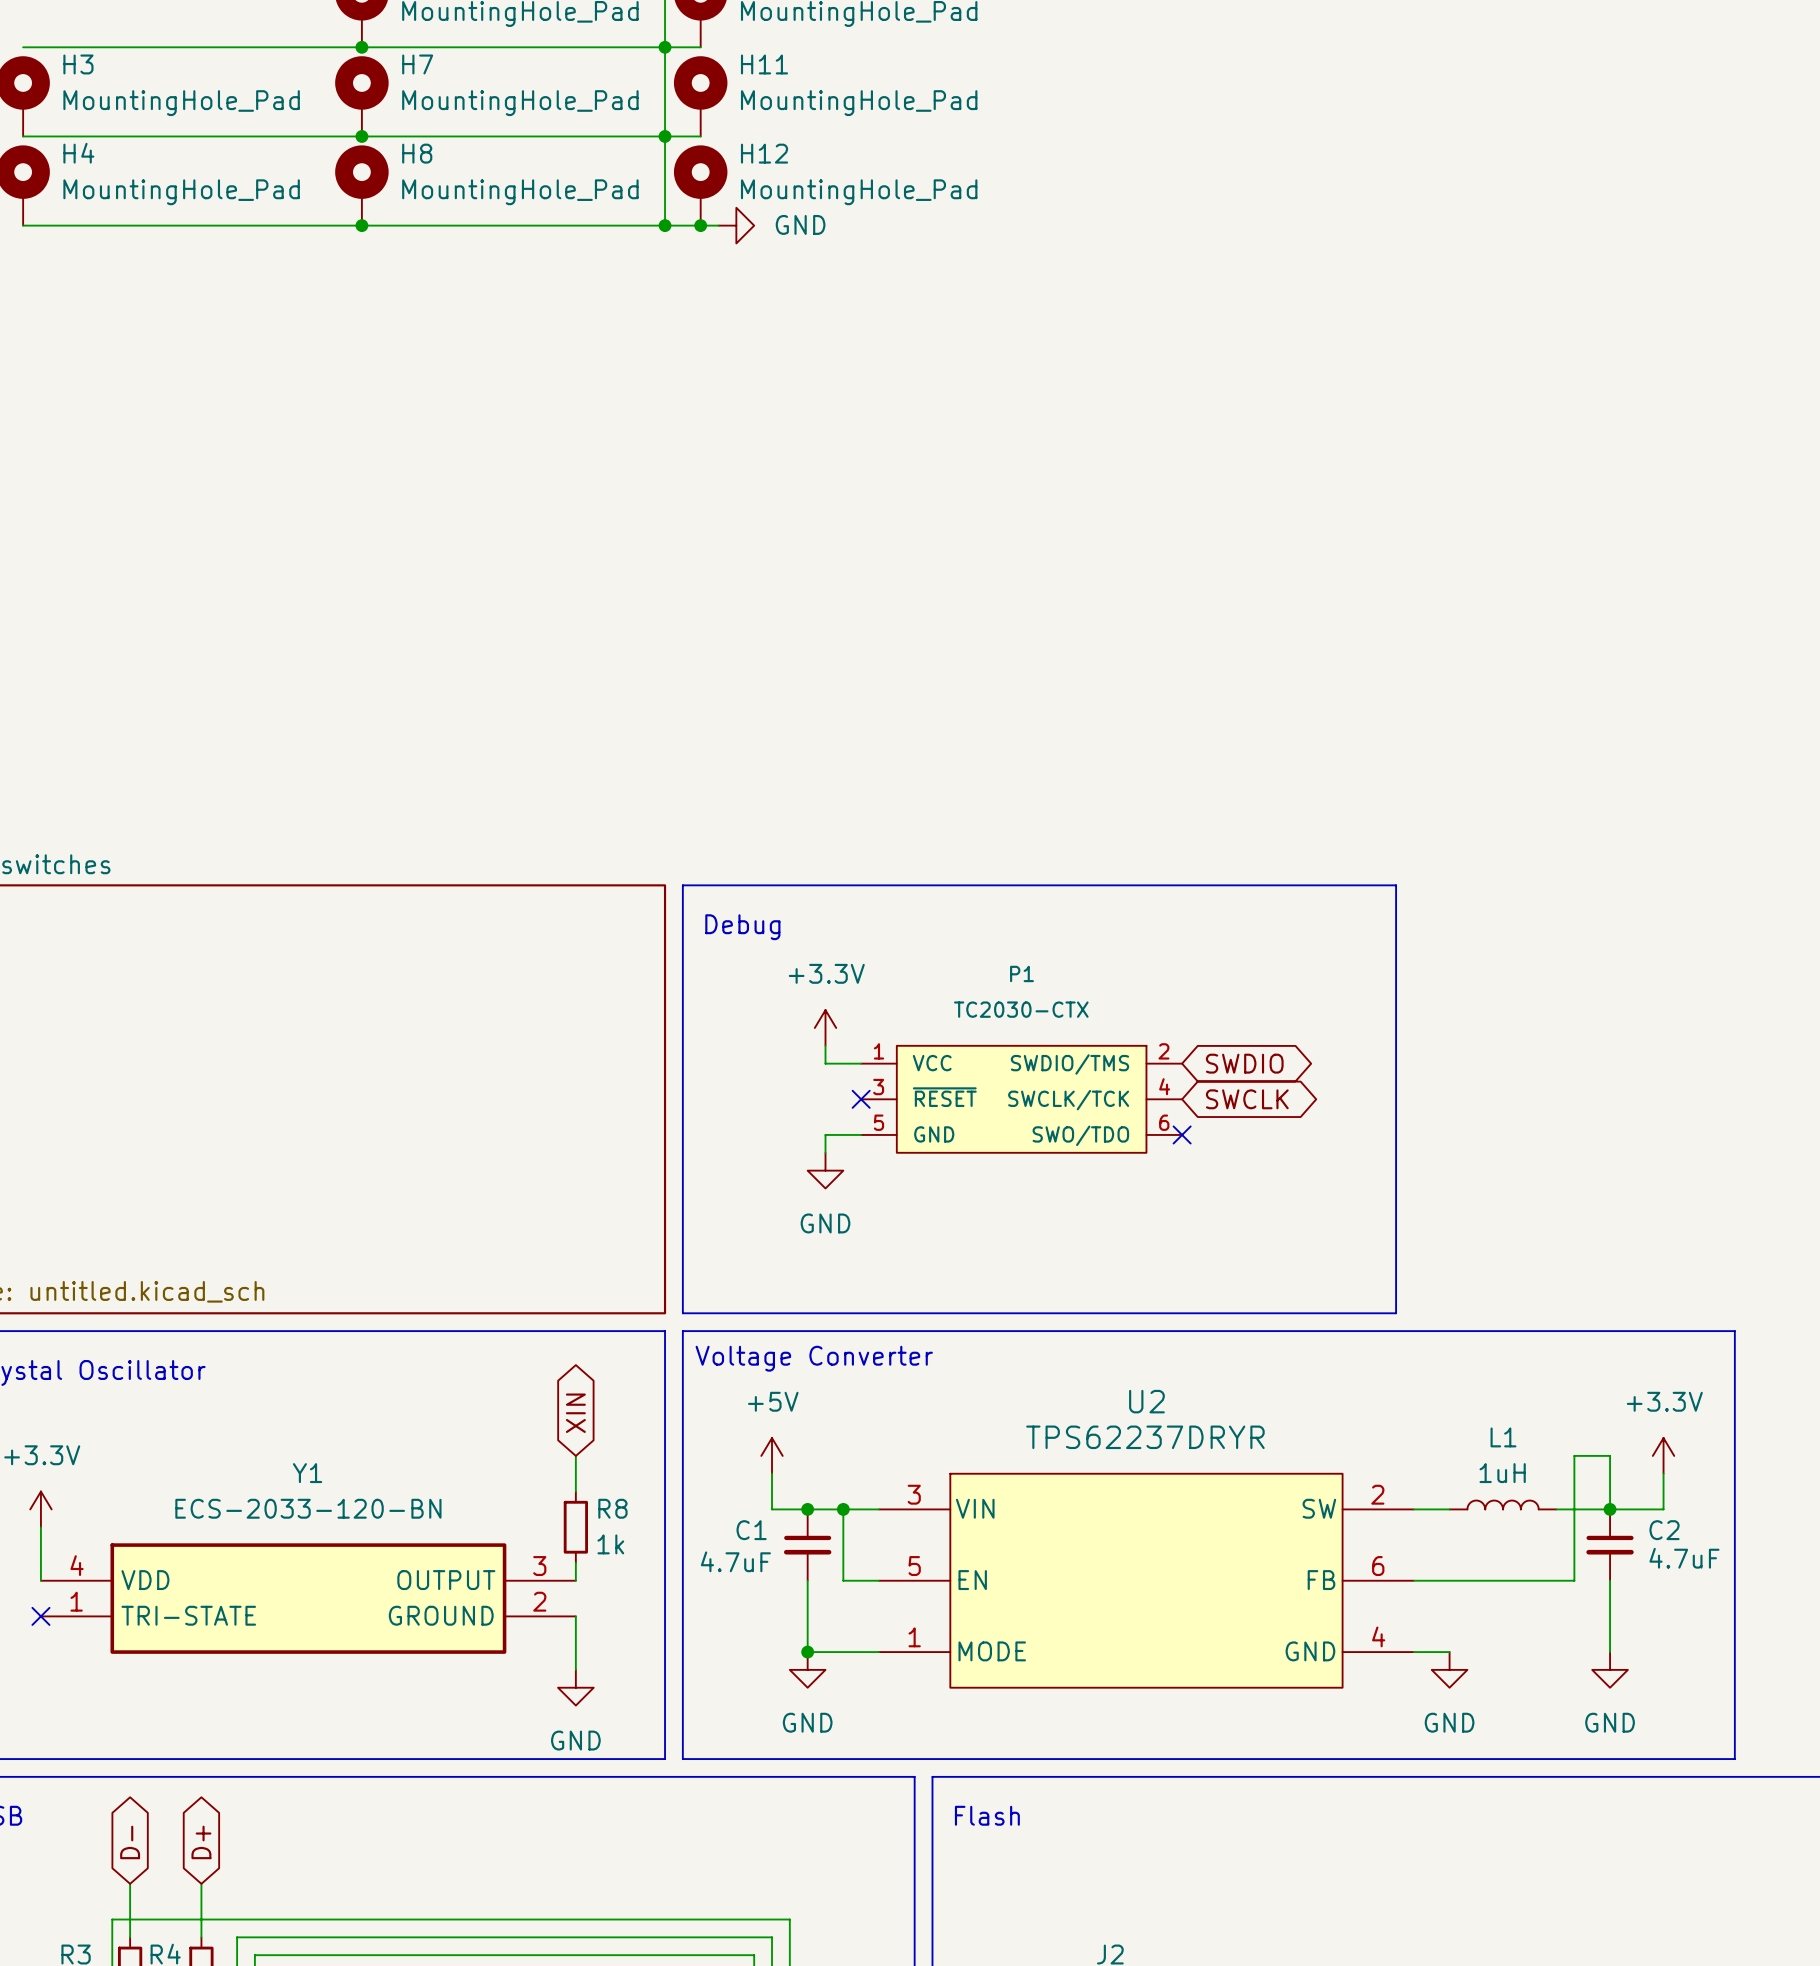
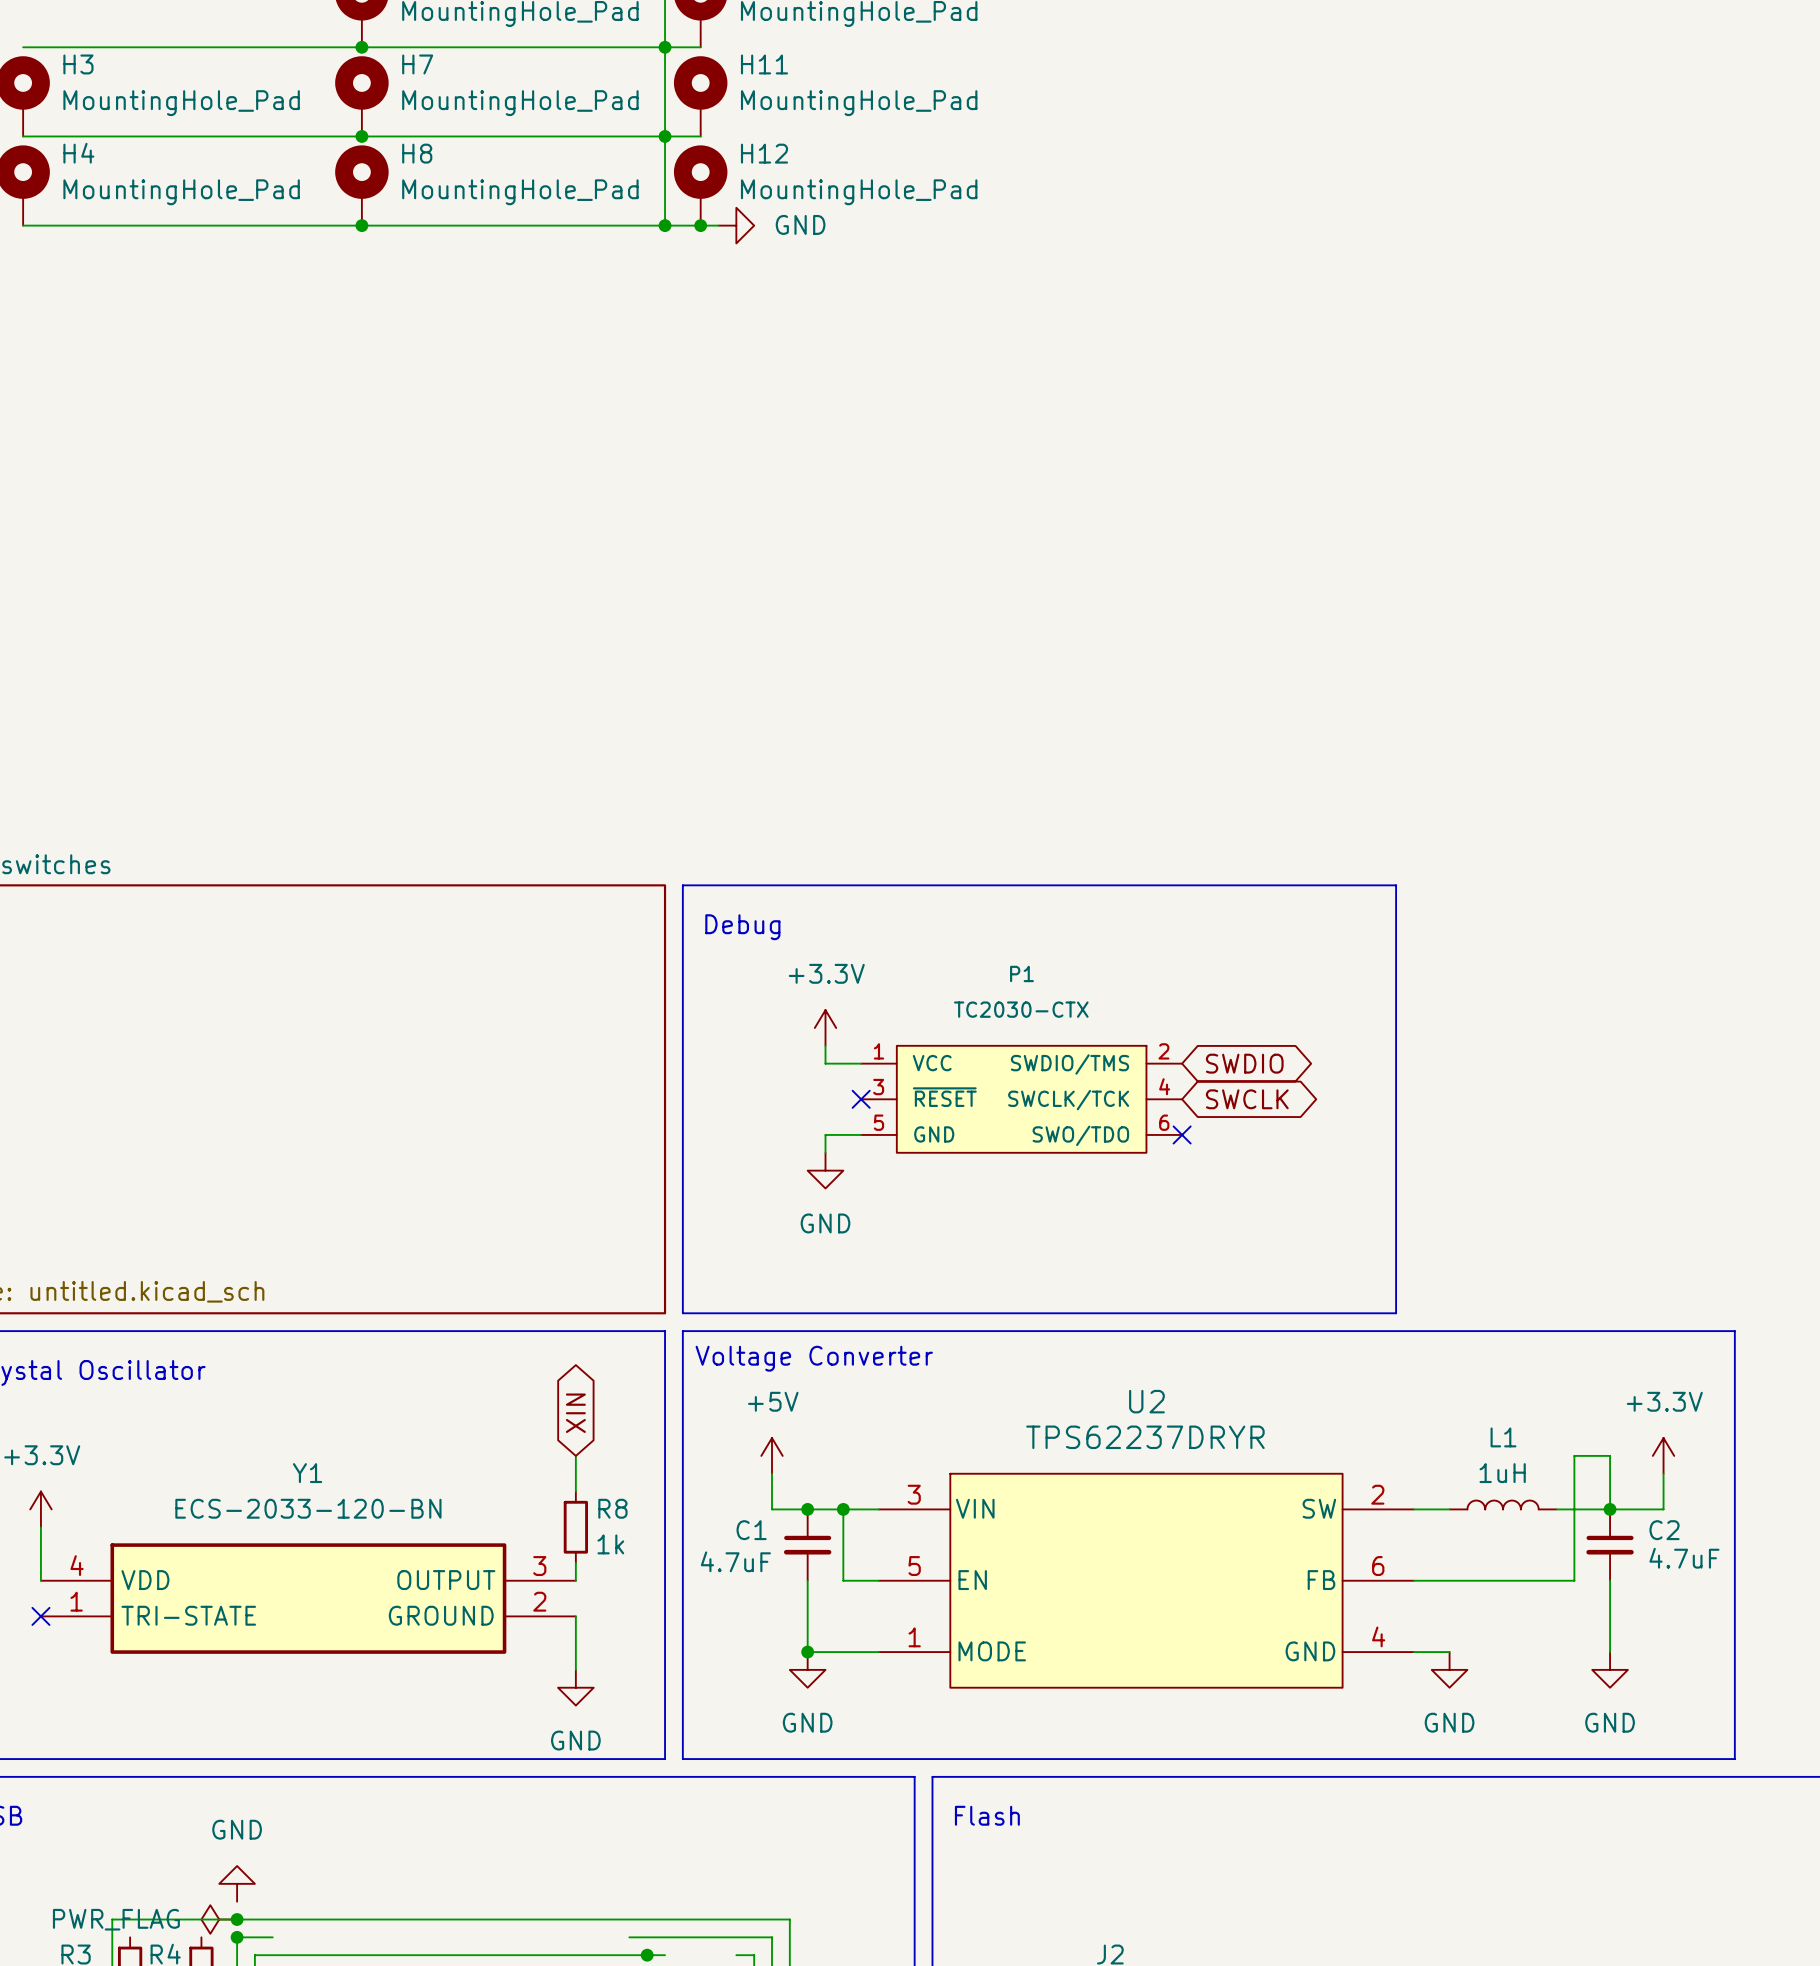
global label: D- (130, 1842) -> none
global label: D+ (201, 1842) -> none
wire: (130, 1883) (130, 1937) -> none
wire: (201, 1883) (201, 1937) -> none
power symbol: none -> GND (237, 1883)
power symbol: none -> PWR_FLAG (219, 1919)
junction: none -> (237, 1919)
junction: none -> (237, 1937)
wire: (272, 1937) (629, 1937) -> none
junction: none -> (647, 1955)
wire: (665, 1955) (736, 1955) -> none

